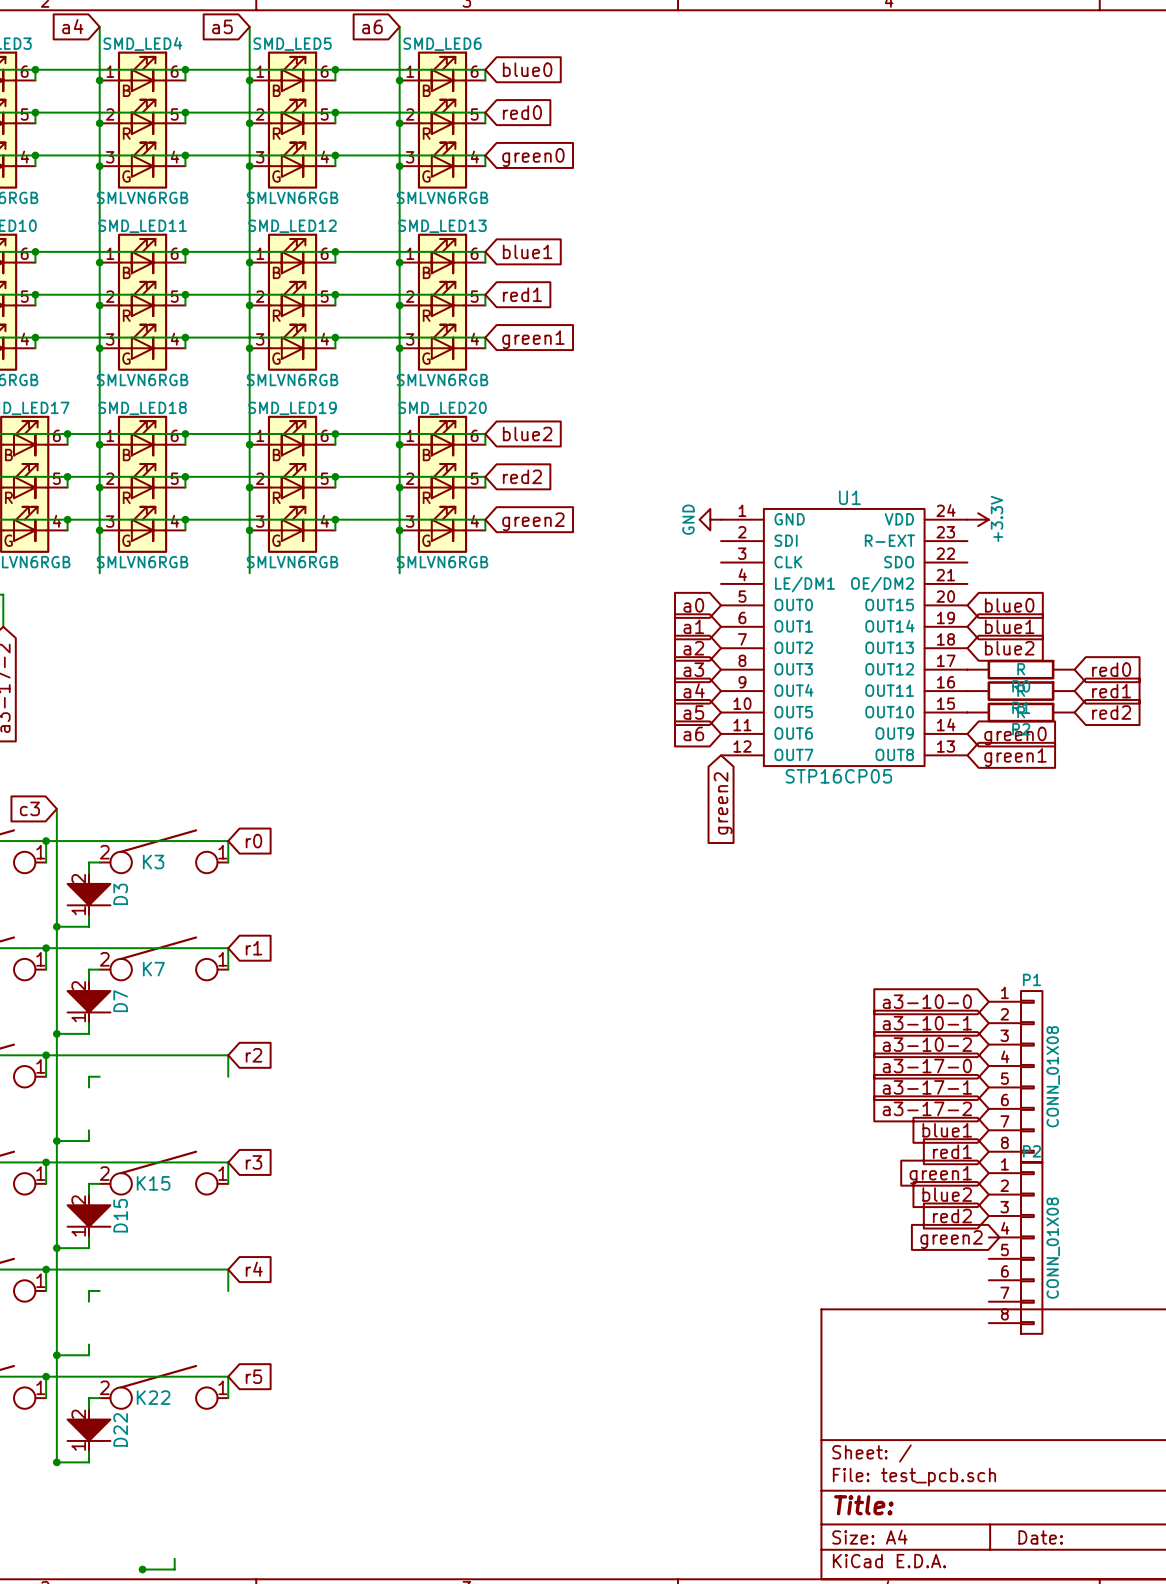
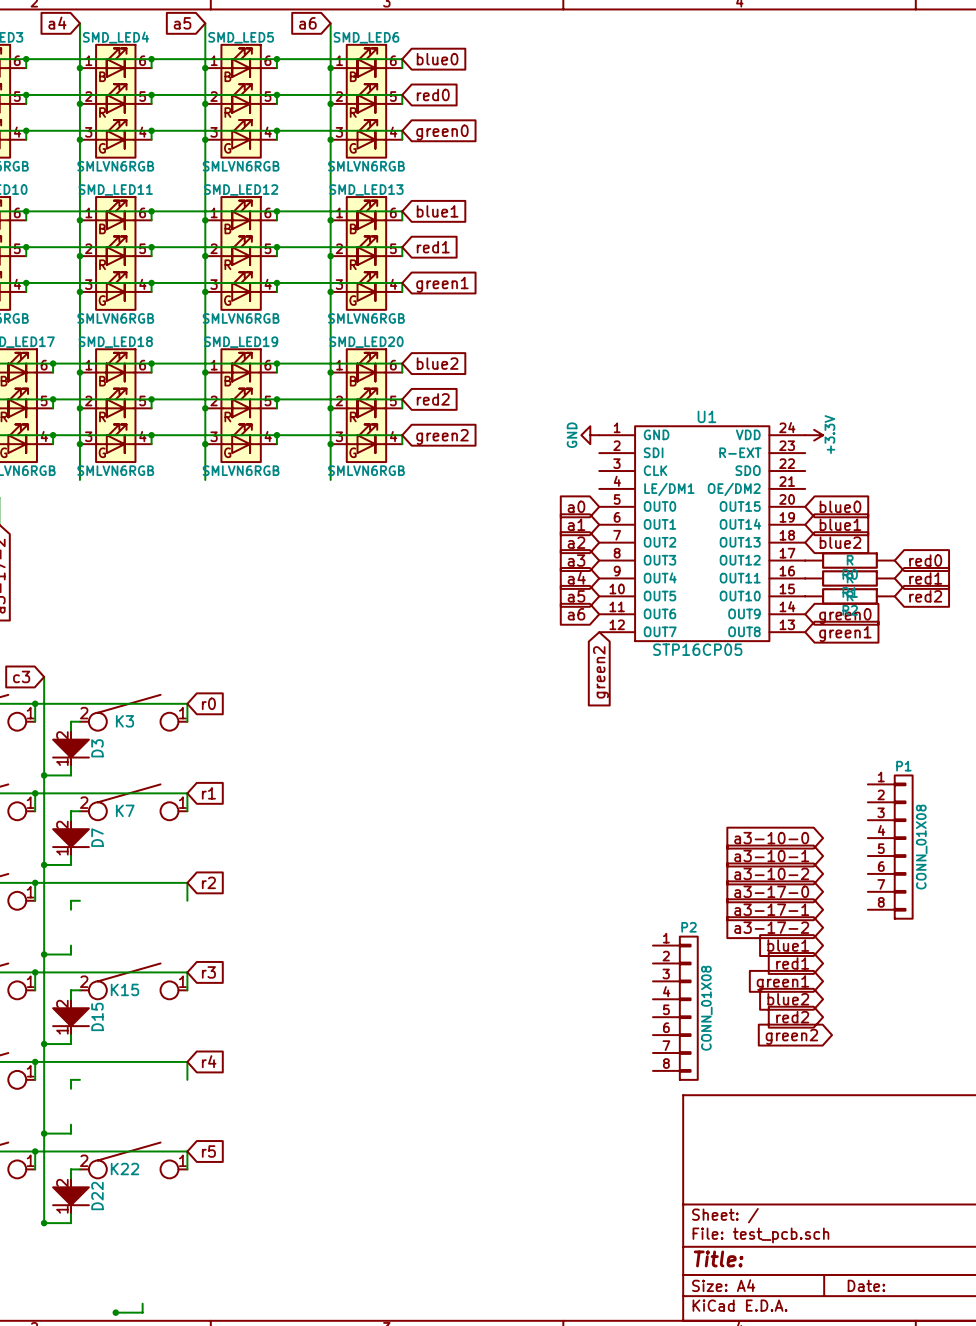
P1 position: (1015, 1076) -> (890, 847)
P2 position: (1015, 1248) -> (675, 1008)

